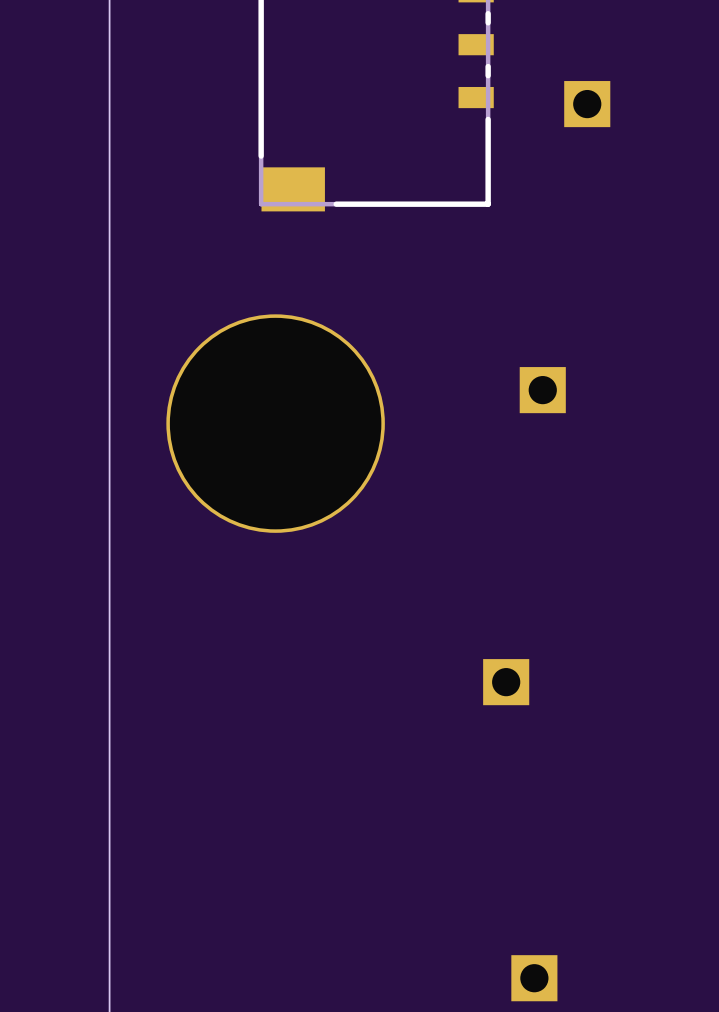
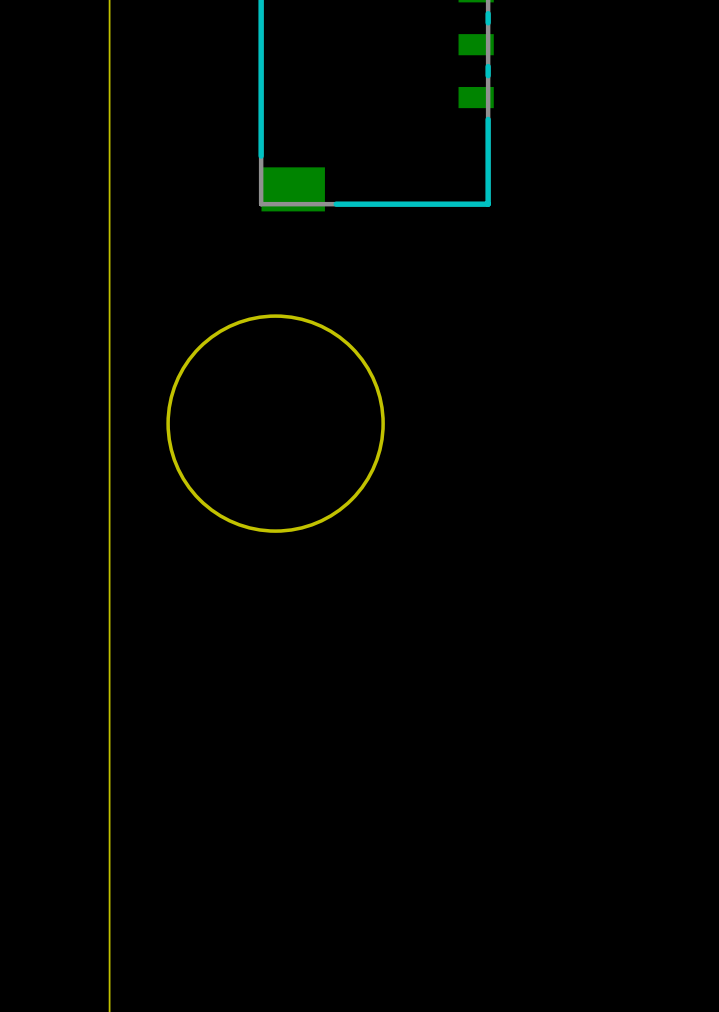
part: (587, 104) -> none
part: (542, 390) -> none
part: (506, 682) -> none
part: (534, 978) -> none

